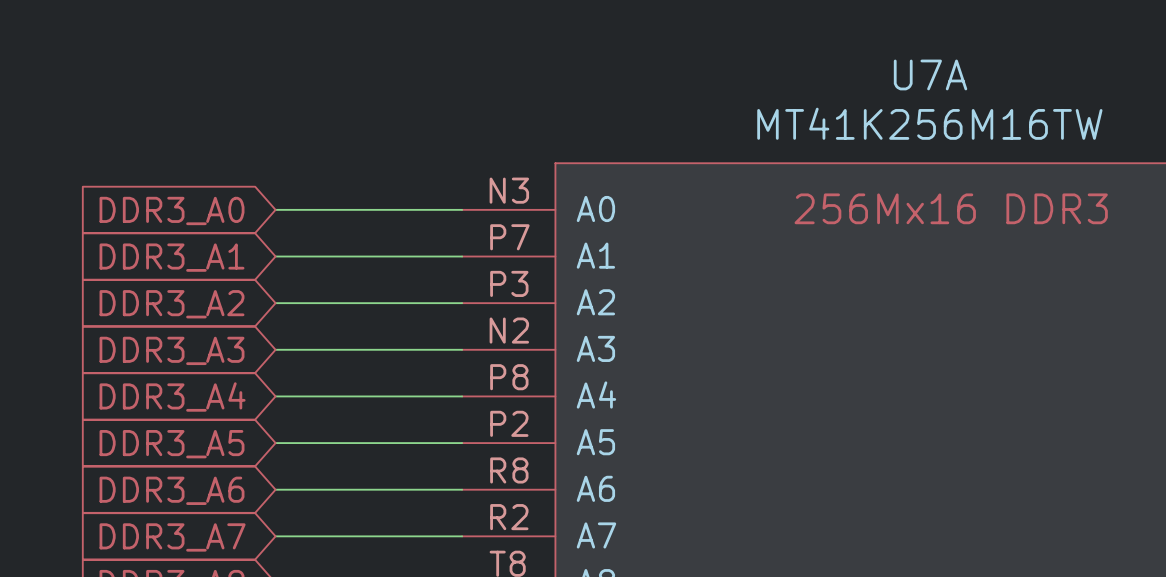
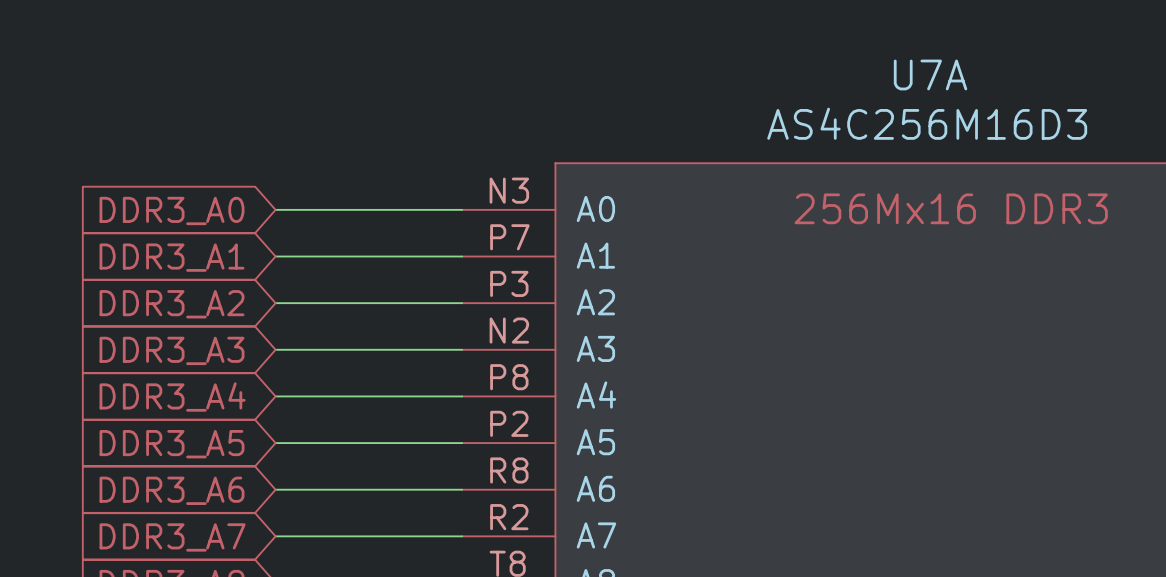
U7A value: MT41K256M16TW (929, 123) -> AS4C256M16D3 (927, 123)

